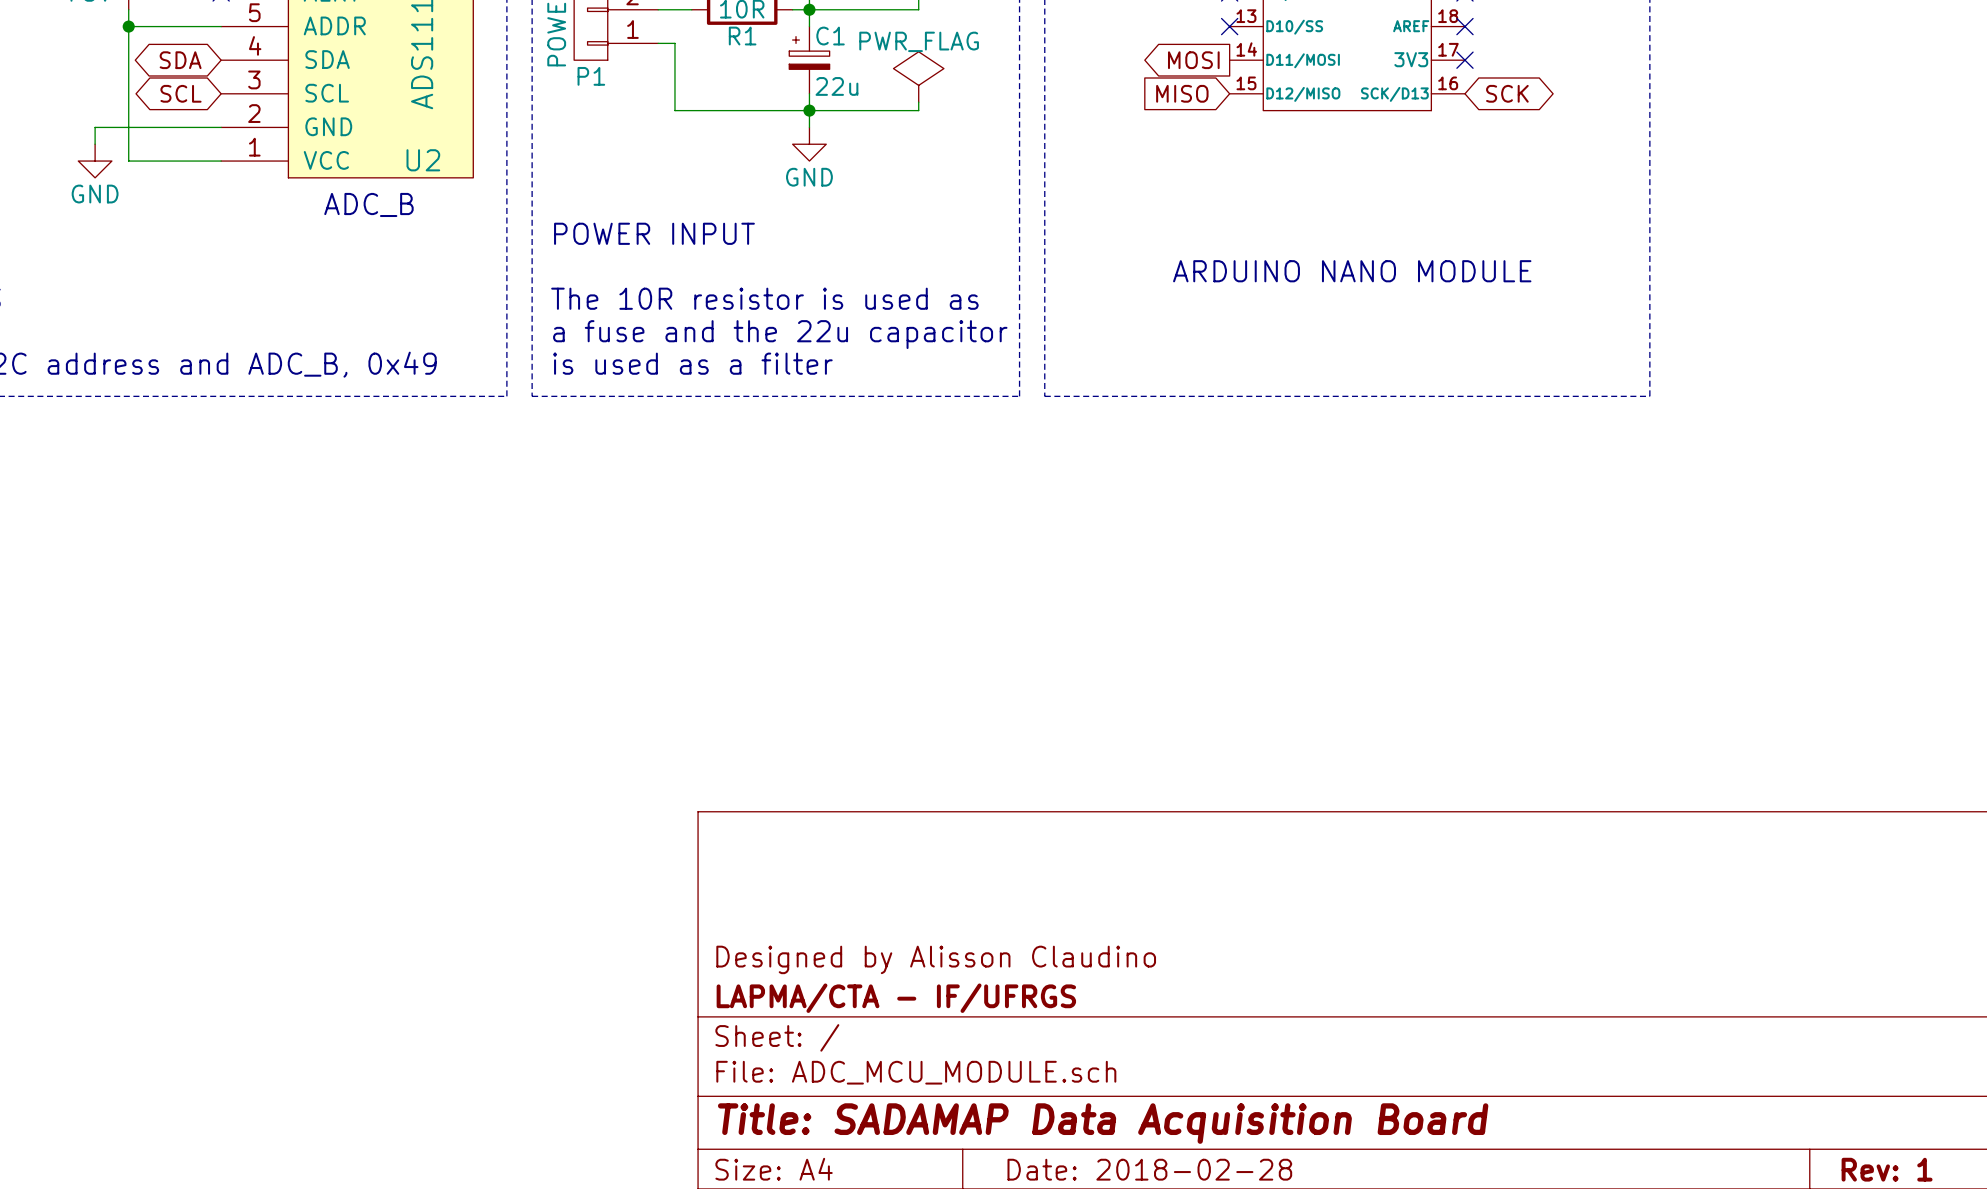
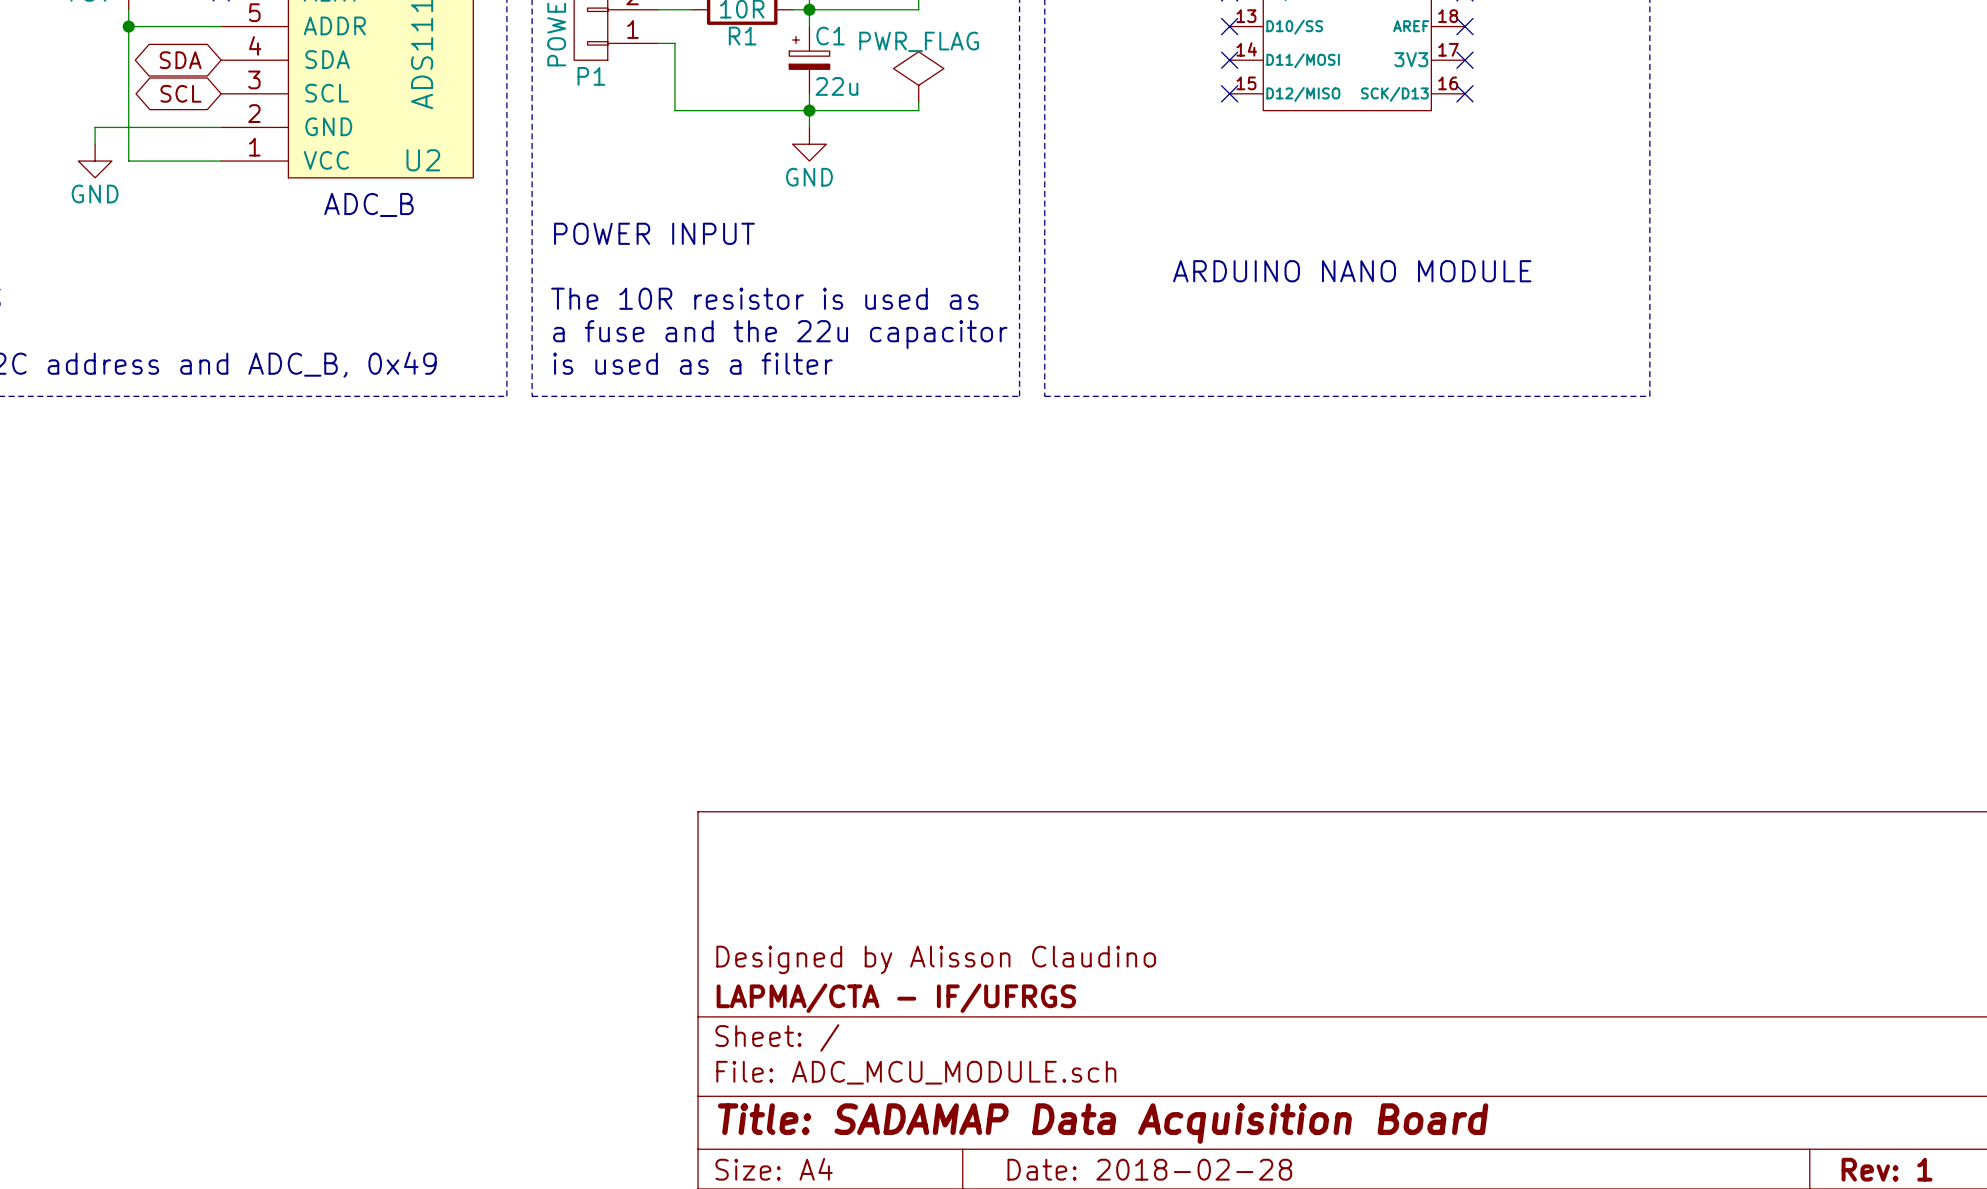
global label: MOSI (1193, 60) -> none
no-connect mark: none -> (1229, 60)
global label: MISO (1182, 93) -> none
no-connect mark: none -> (1229, 93)
no-connect mark: none -> (1464, 93)
global label: SCK (1507, 93) -> none

